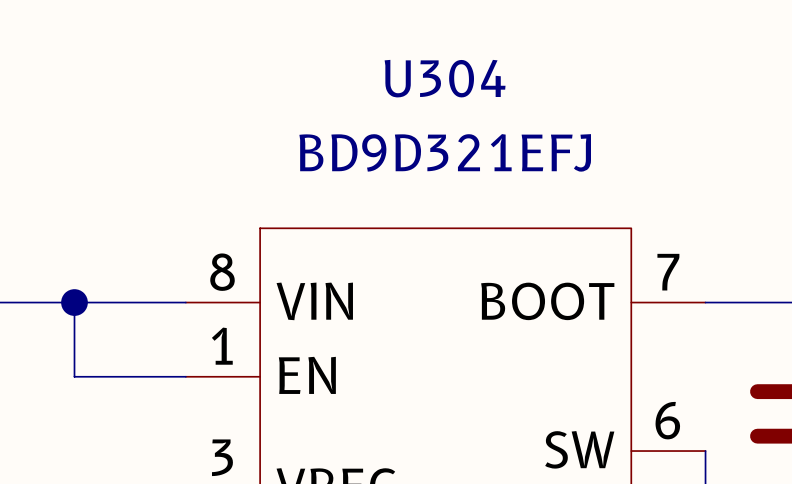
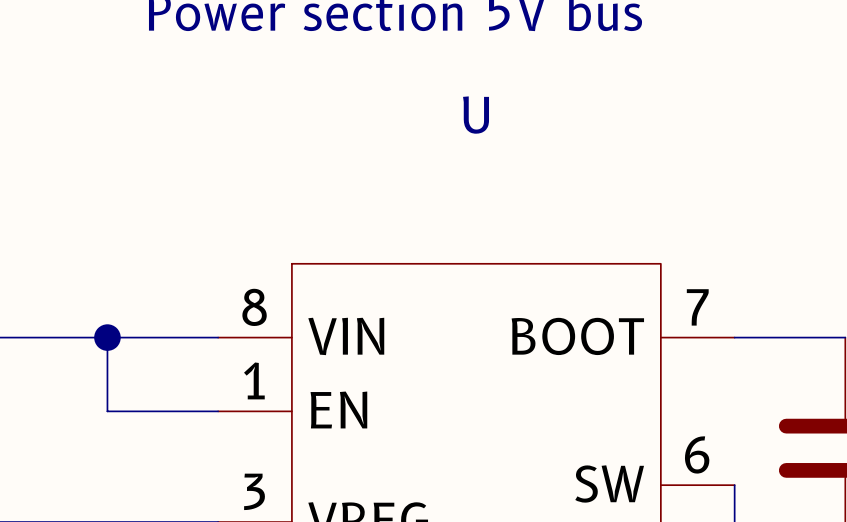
U304 name: U304 (445, 78) -> U (476, 115)
U304 value: BD9D321EFJ (445, 152) -> none

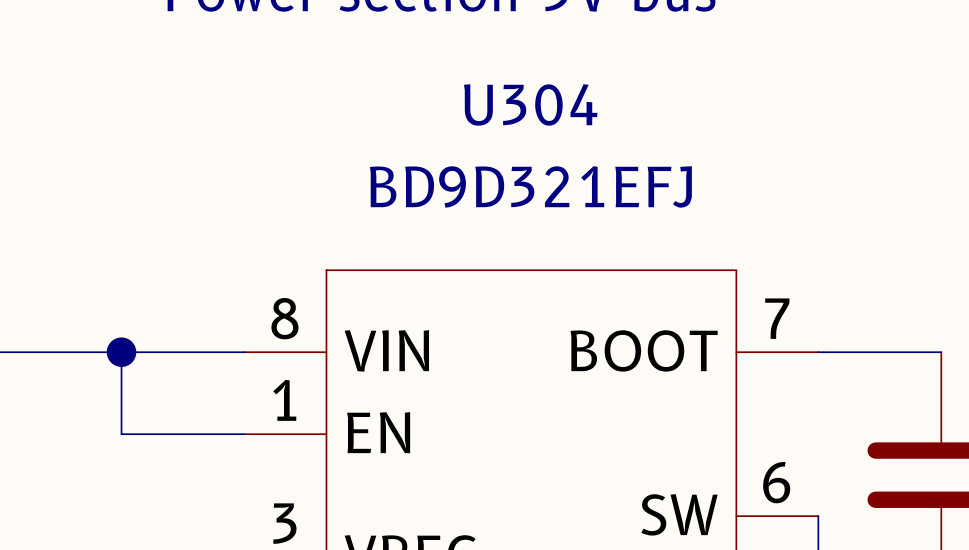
U name: U (476, 115) -> U304 (530, 104)
U value: none -> BD9D321EFJ (530, 186)

